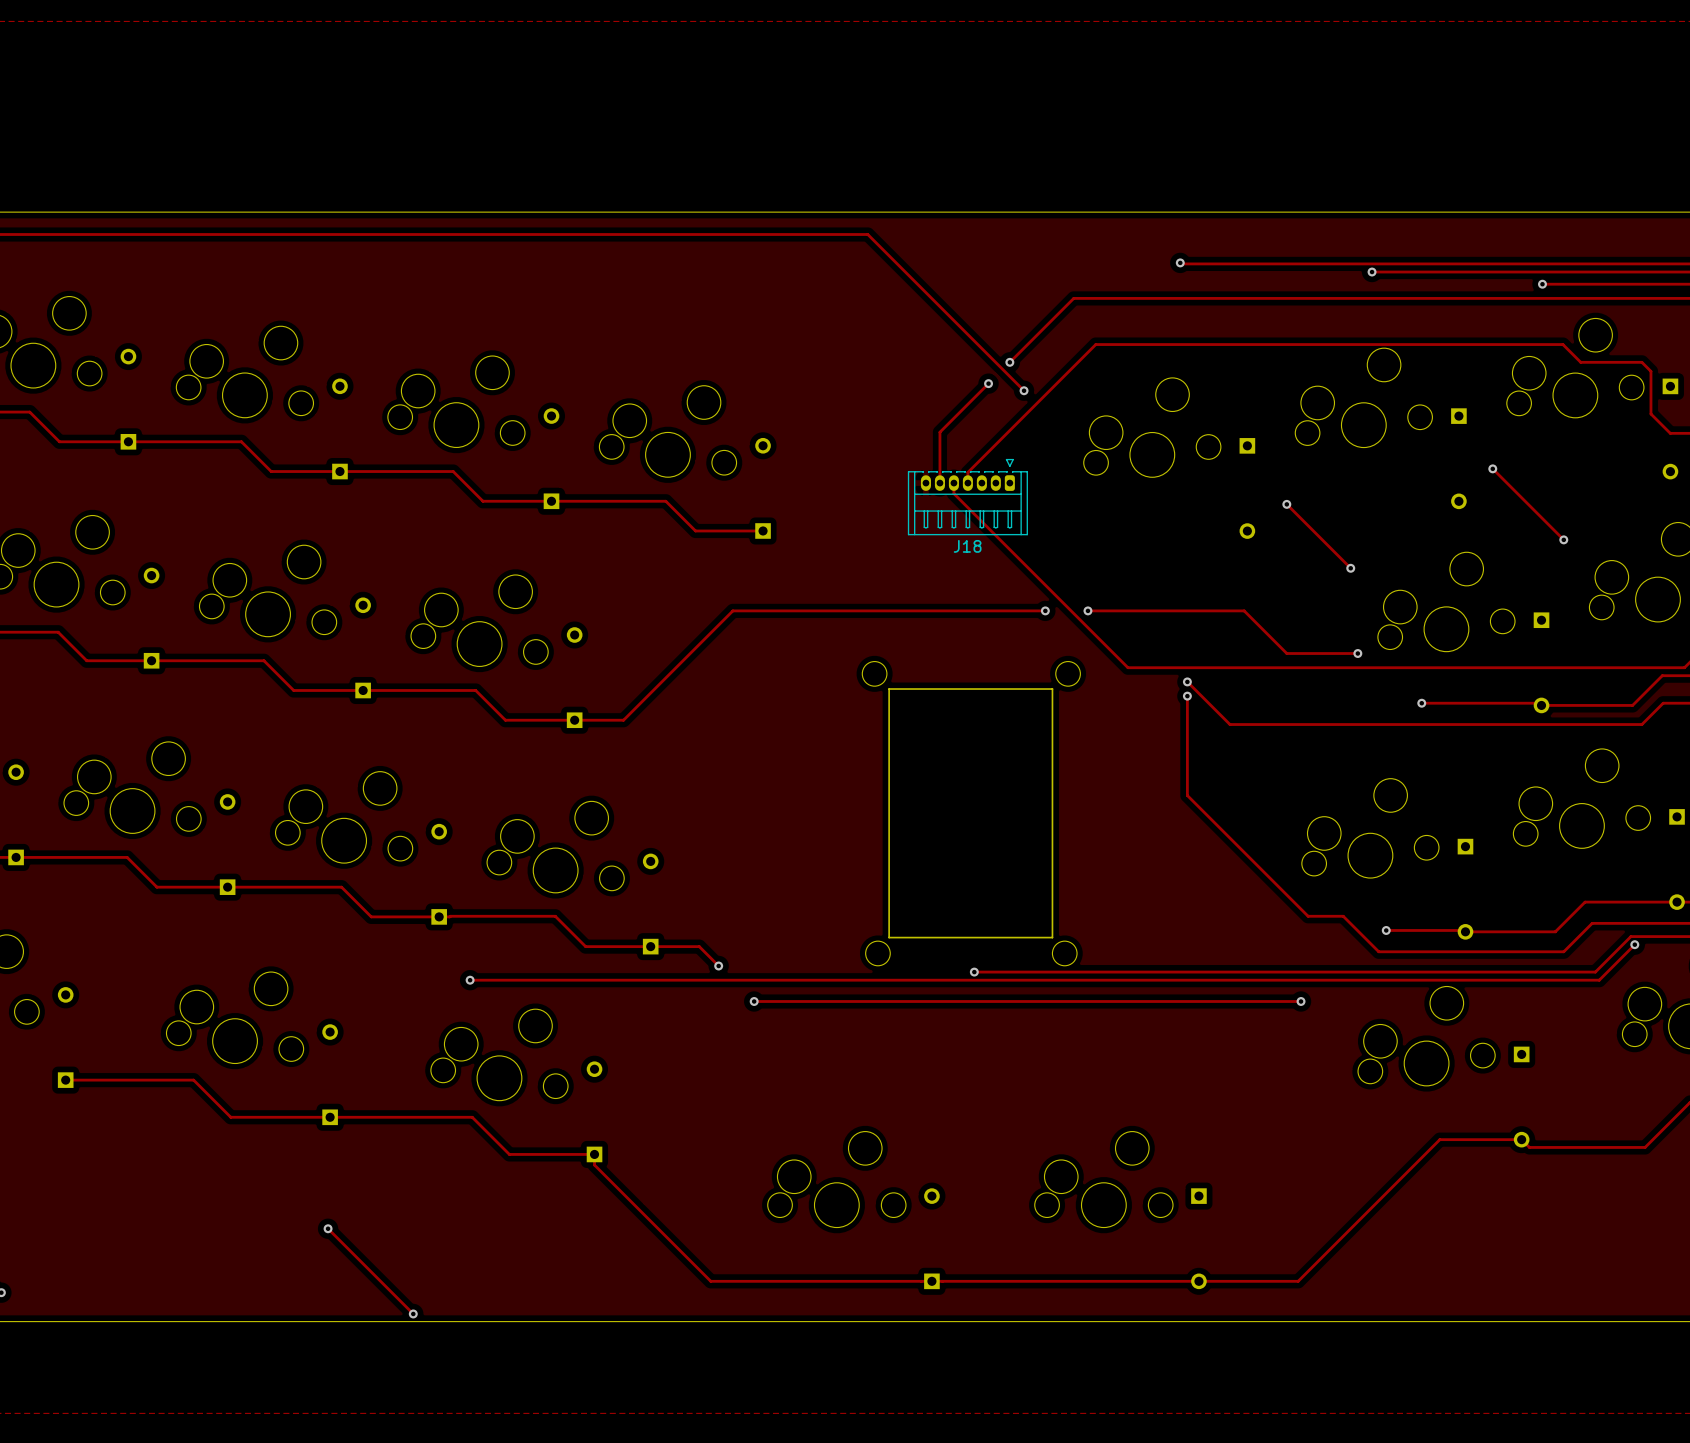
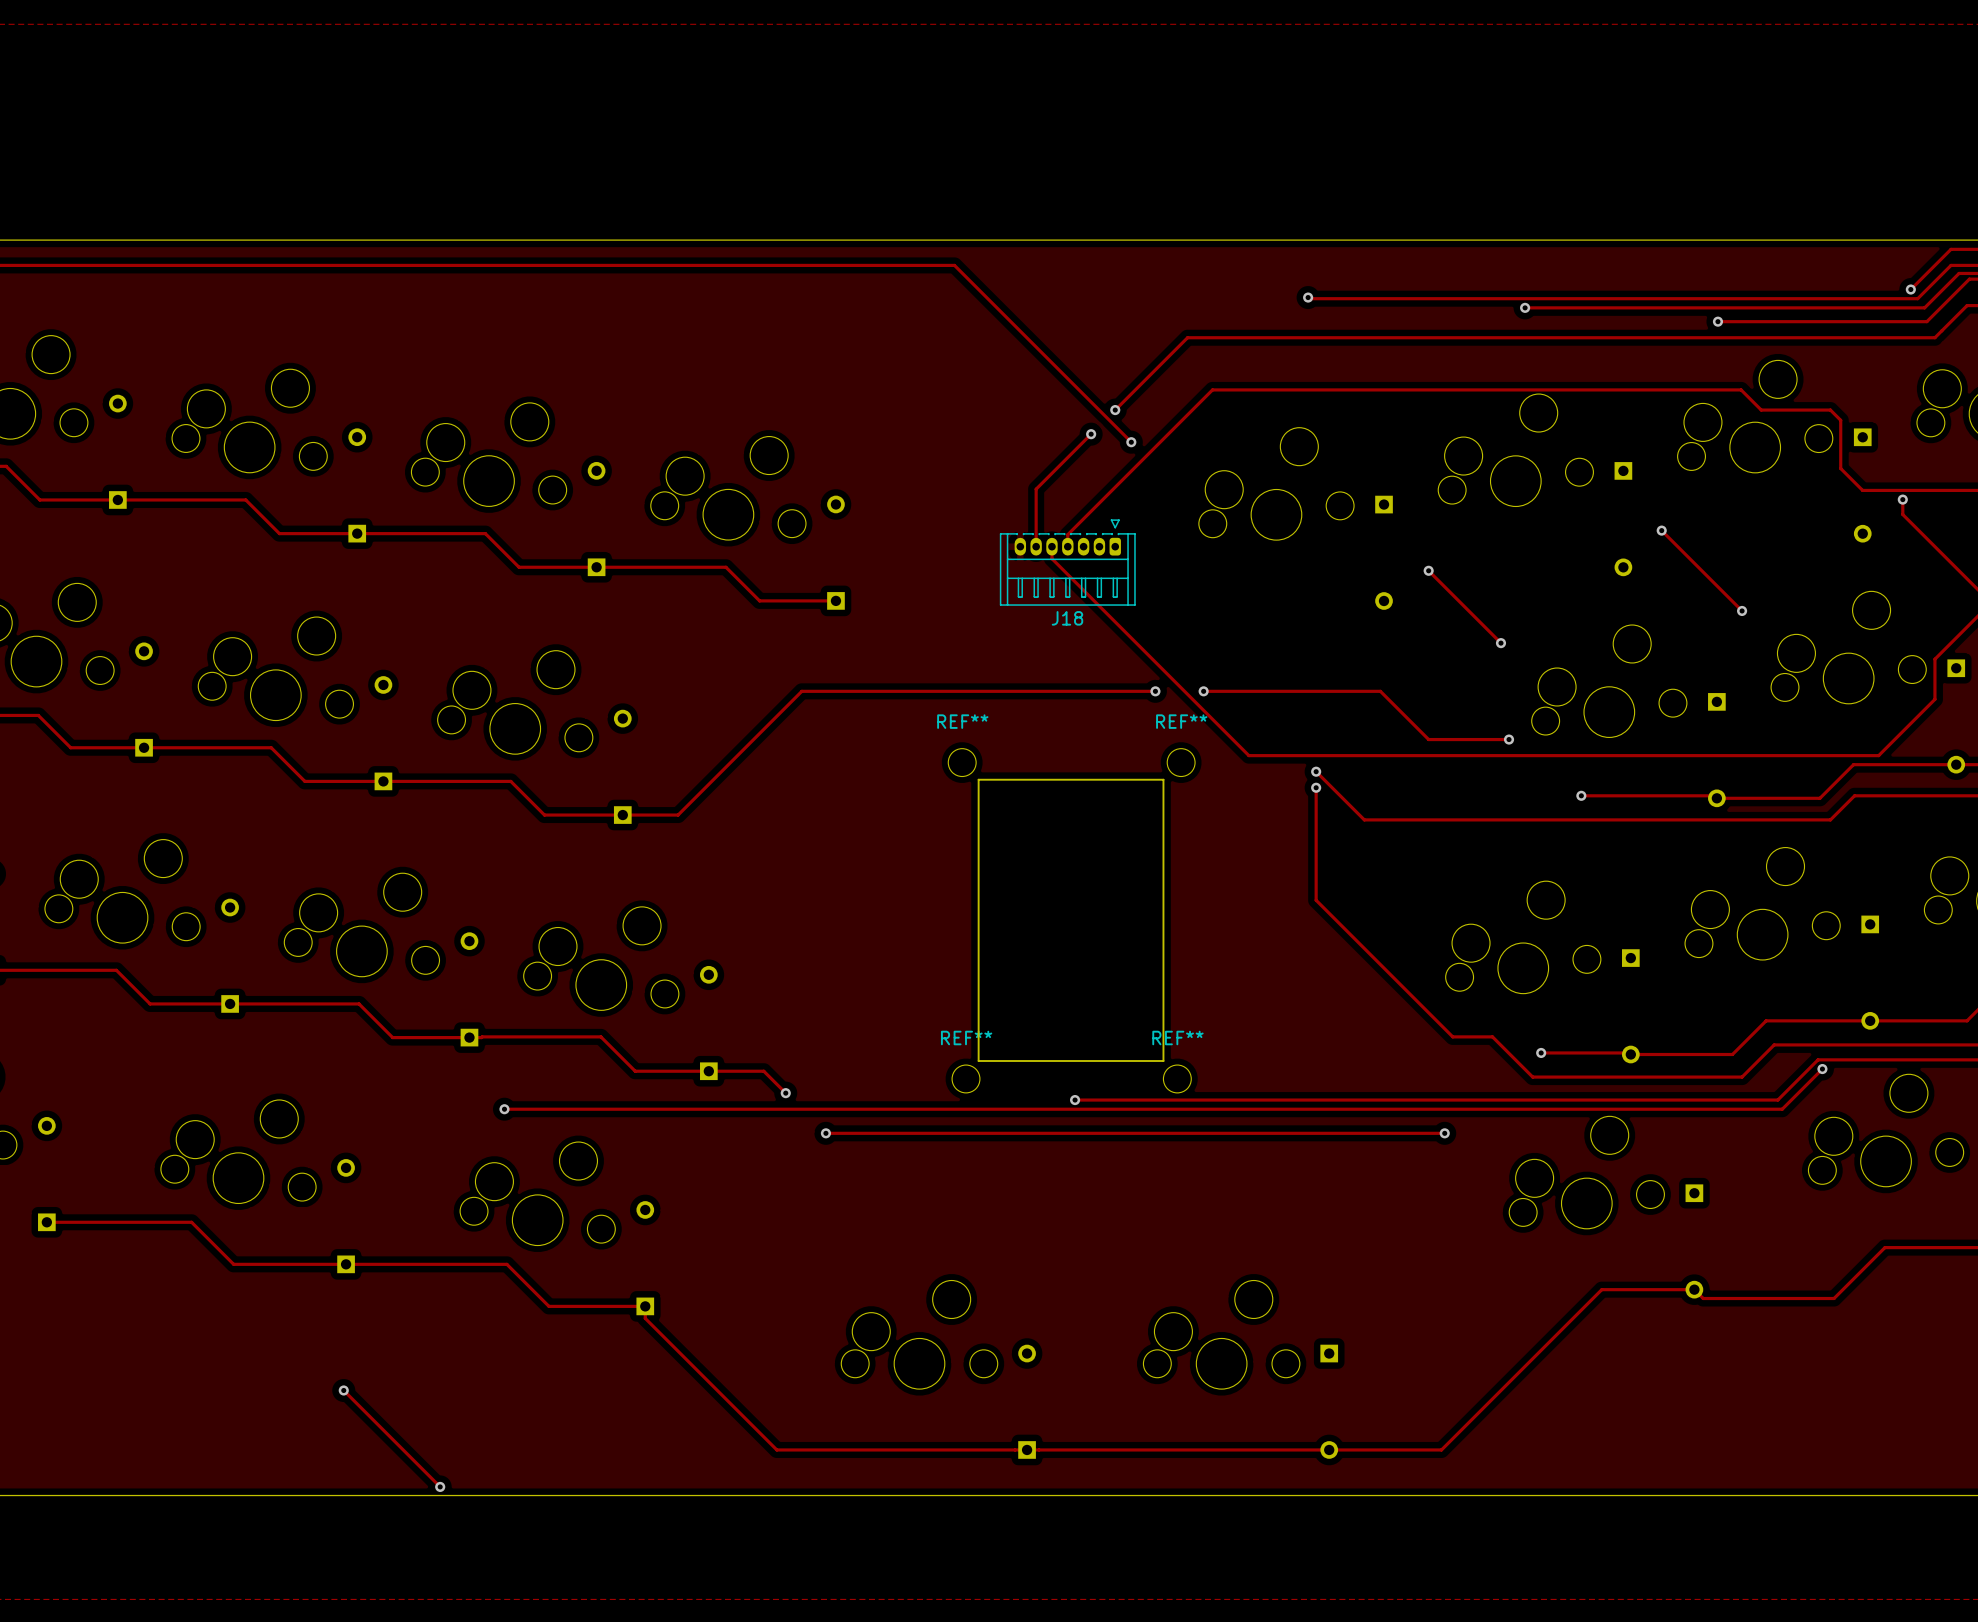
REF** name: none -> REF** (962, 721)
REF** name: none -> REF** (1181, 721)
REF** name: none -> REF** (966, 1038)
REF** name: none -> REF** (1177, 1038)

